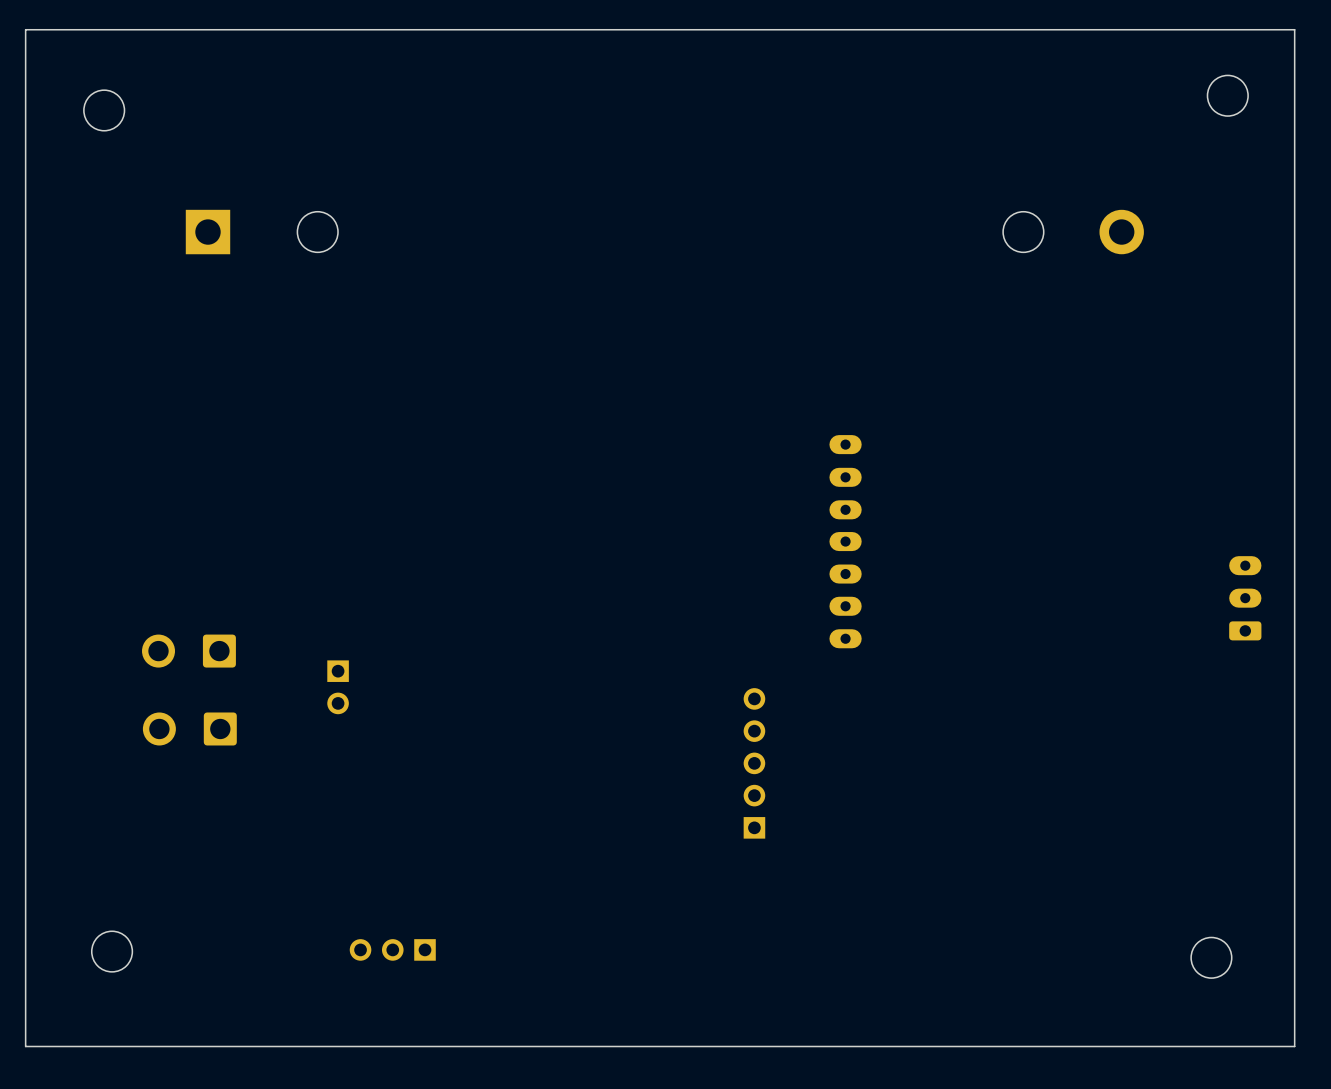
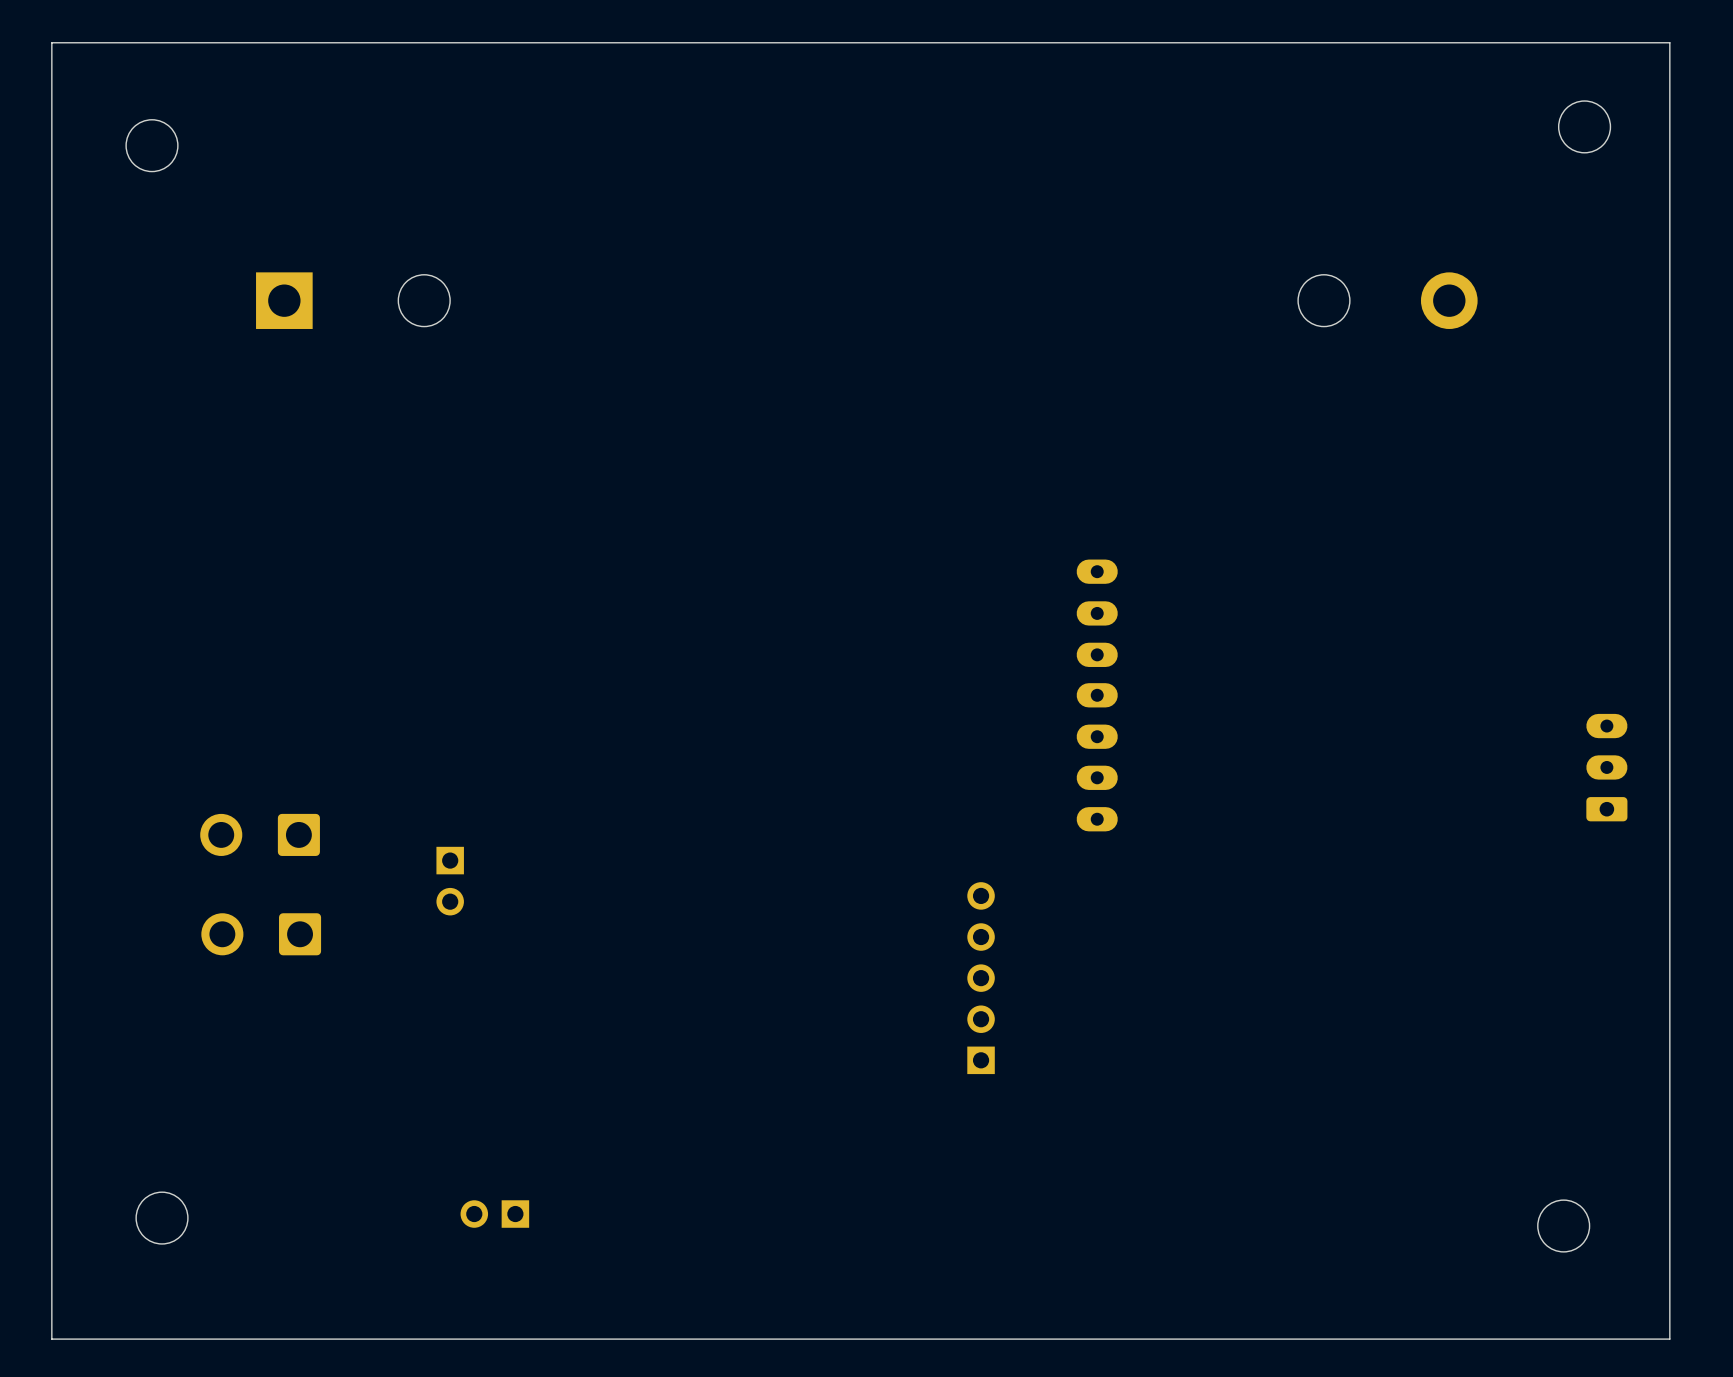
part: none -> (494, 1214)
part: (392, 949) -> none

